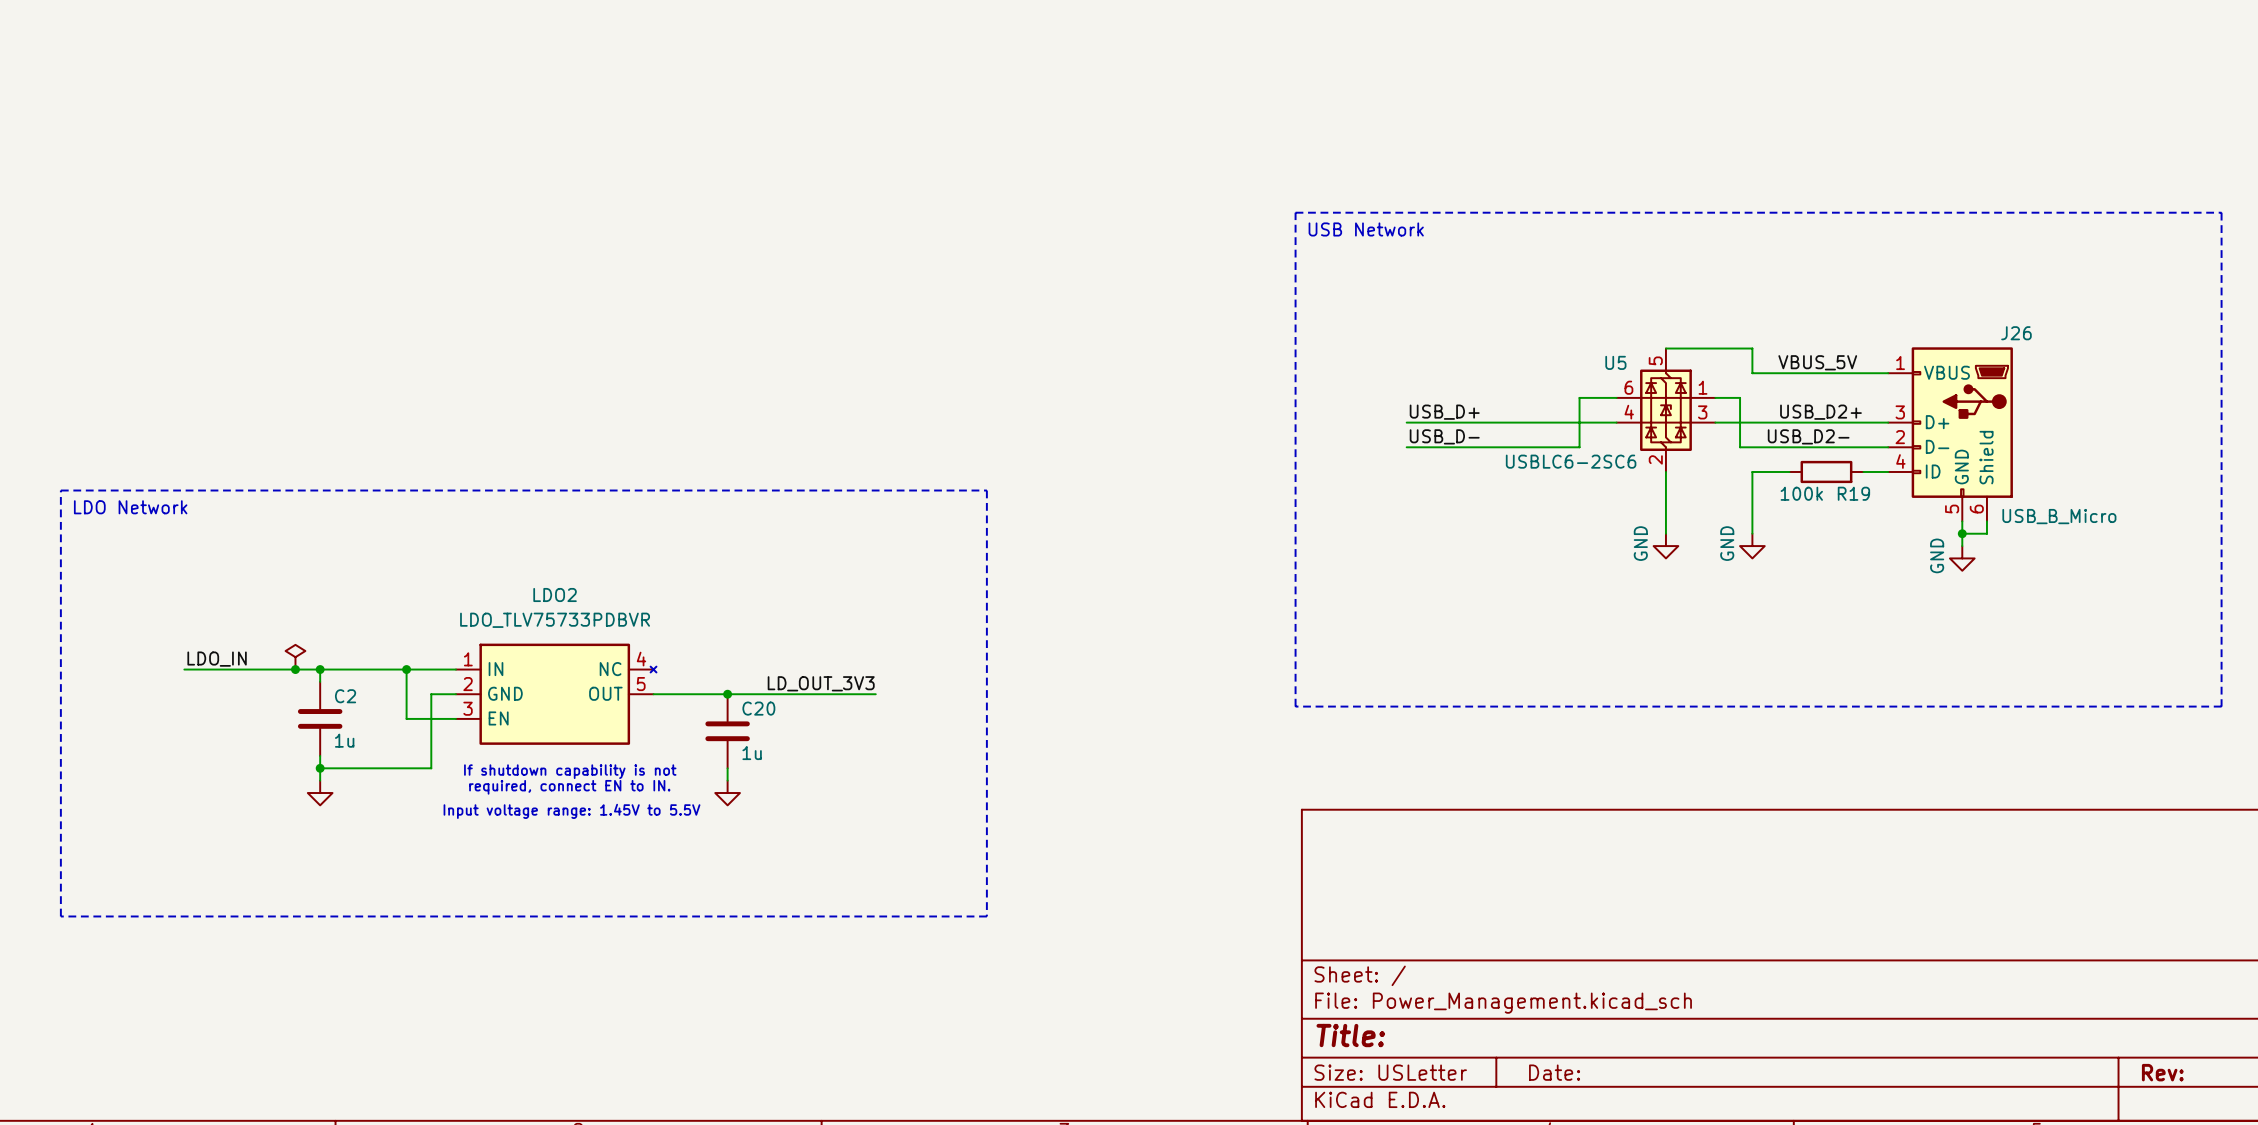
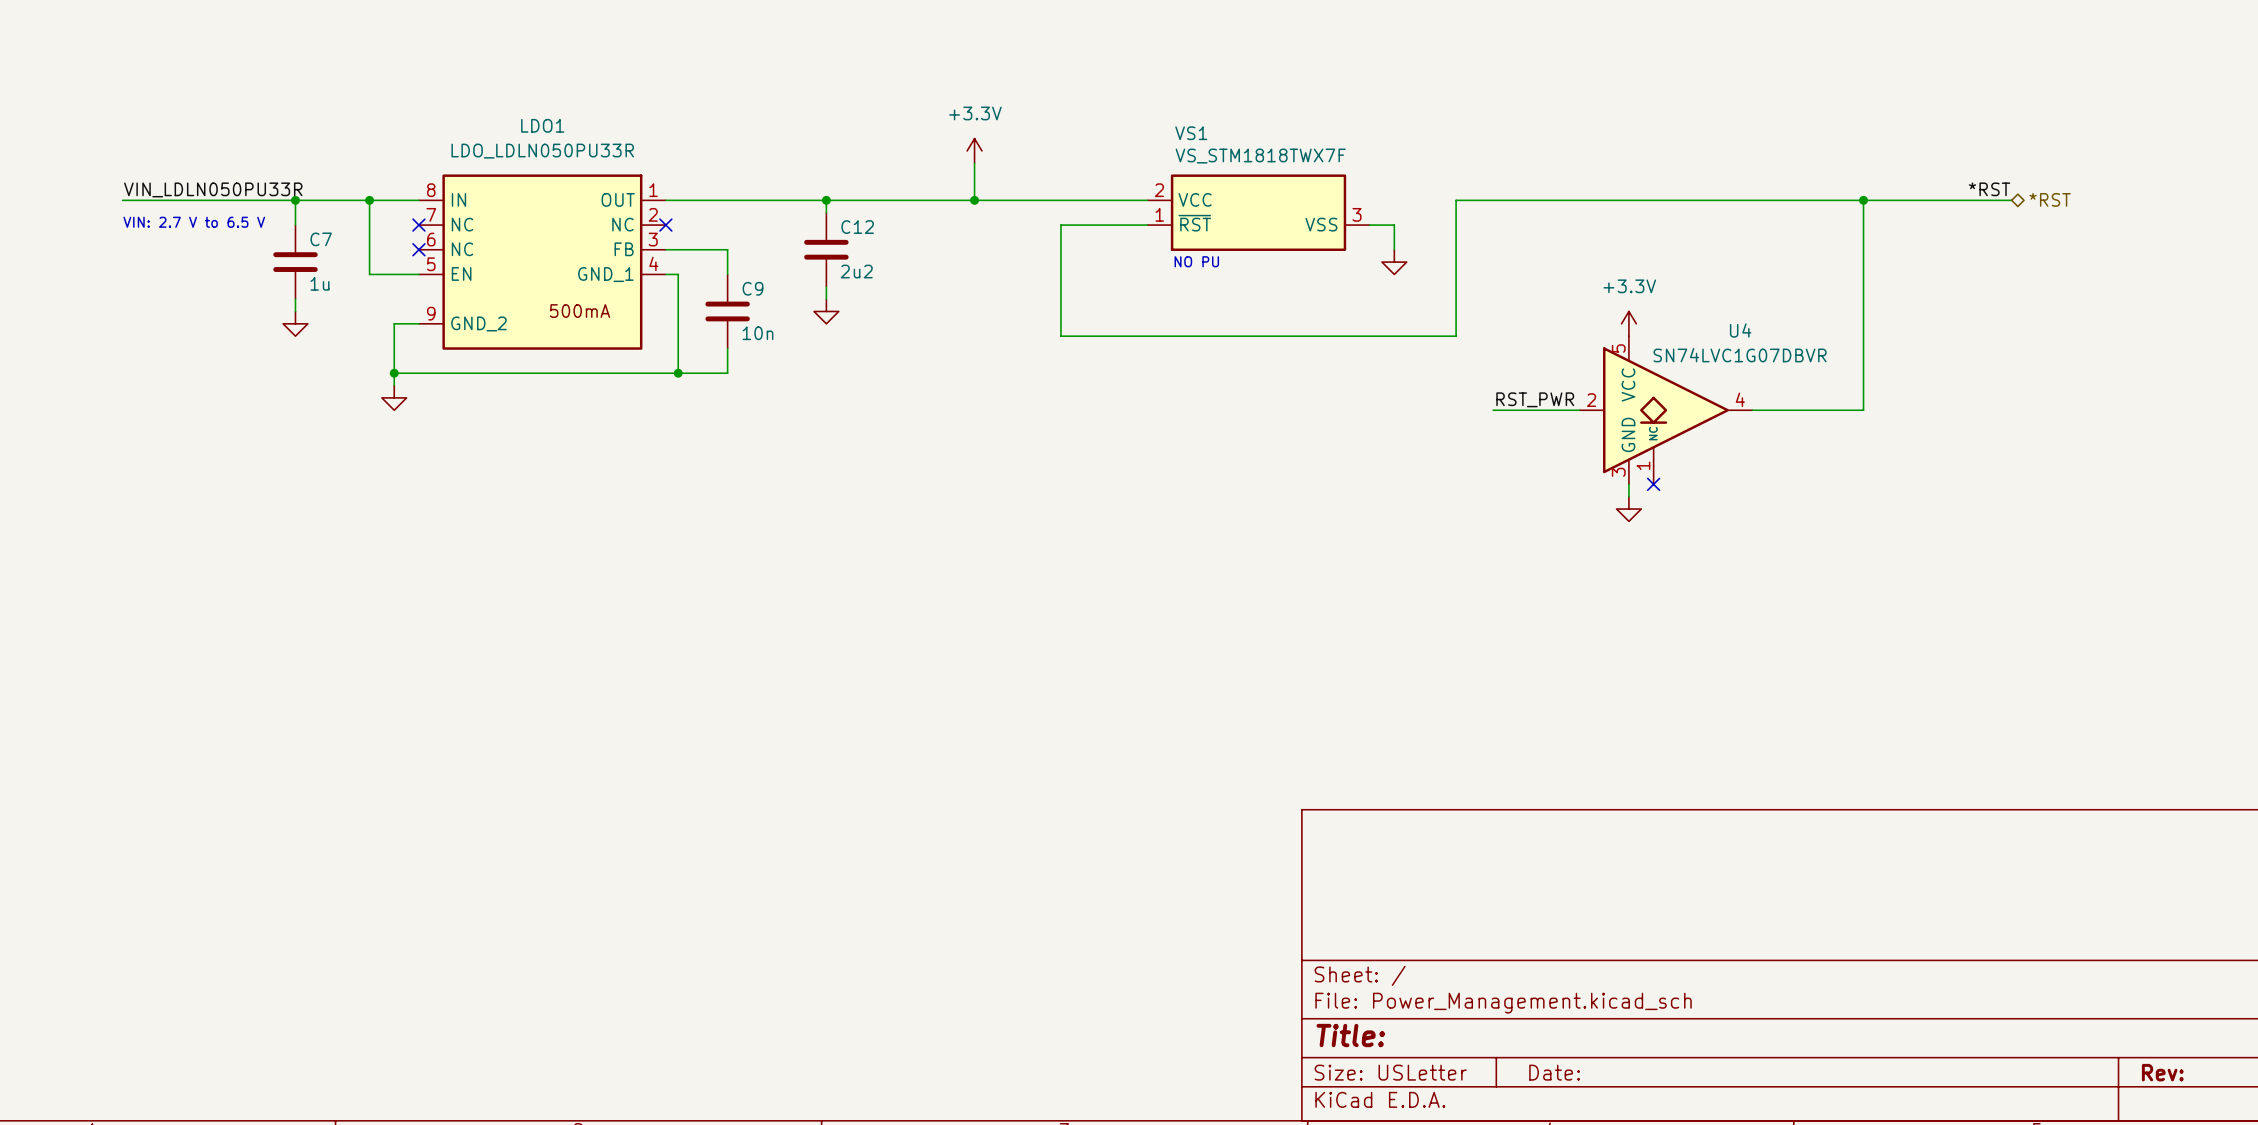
power symbol: none -> +3.3V (974, 150)
wire: none -> (974, 163) (974, 200)
label: none -> VIN_LDLN050PU33R (213, 189)
label: none -> *RST (1989, 189)
hierarchical label: none -> *RST (2050, 199)
wire: none -> (122, 200) (418, 200)
wire: none -> (295, 200) (295, 225)
junction: none -> (295, 200)
wire: none -> (369, 200) (369, 274) (418, 274)
junction: none -> (369, 200)
wire: none -> (665, 200) (1147, 200)
wire: none -> (826, 200) (826, 212)
junction: none -> (826, 200)
junction: none -> (974, 200)
wire: none -> (1863, 200) (1863, 410) (1752, 410)
junction: none -> (1863, 200)
wire: none -> (2011, 200) (1456, 200) (1456, 336) (1060, 336) (1060, 225) (1147, 225)
VS1: none -> VS_STM1818TWX7F (1258, 212)
line: (1295, 212) (2221, 212) (2221, 706) (1295, 706) (1295, 212) -> none
text: none -> VIN: 2.7 V to 6.5 V (194, 222)
no-connect mark: none -> (418, 225)
no-connect mark: none -> (665, 225)
wire: none -> (1369, 225) (1394, 225) (1394, 249)
text: USB Network (1366, 229) -> none
no-connect mark: none -> (418, 249)
wire: none -> (665, 249) (727, 249) (727, 274)
C12: none -> 2u2 (826, 249)
text: none -> NO PU (1196, 261)
C7: none -> 1u (295, 262)
LDO1: none -> LDO_LDLN050PU33R (542, 262)
power symbol: none -> (1394, 262)
wire: none -> (665, 274) (678, 274) (678, 373)
wire: none -> (826, 286) (826, 299)
wire: none -> (295, 299) (295, 311)
C9: none -> 10n (727, 311)
power symbol: none -> (826, 311)
power symbol: none -> (295, 323)
wire: none -> (418, 323) (394, 323) (394, 385)
power symbol: none -> +3.3V (1628, 323)
wire: none -> (727, 348) (727, 373) (394, 373)
wire: (1665, 348) (1752, 348) (1752, 373) (1888, 373) -> none
label: VBUS_5V (1817, 362) -> none
junction: none -> (394, 373)
junction: none -> (678, 373)
power symbol: none -> (394, 397)
wire: (1616, 397) (1579, 397) (1579, 447) (1406, 447) -> none
wire: (1715, 397) (1740, 397) (1740, 447) (1888, 447) -> none
label: none -> RST_PWR (1535, 399)
wire: none -> (1493, 410) (1579, 410)
U5: USBLC6-2SC6 (1665, 410) -> none
U4: none -> SN74LVC1G07DBVR (1665, 410)
label: USB_D+ (1444, 412) -> none
label: USB_D2+ (1820, 412) -> none
wire: (1406, 422) (1616, 422) -> none
wire: (1715, 422) (1888, 422) -> none
J26: USB_B_Micro (1950, 434) -> none
label: USB_D- (1444, 436) -> none
label: USB_D2- (1808, 436) -> none
wire: (1665, 471) (1665, 533) -> none
wire: (1789, 471) (1752, 471) (1752, 533) -> none
R19: 100k (1826, 471) -> none
wire: (1863, 471) (1888, 471) -> none
wire: none -> (1628, 484) (1628, 496)
no-connect mark: none -> (1653, 484)
line: (60, 490) (986, 490) (986, 916) (60, 916) (60, 490) -> none
text: LDO Network (130, 507) -> none
power symbol: none -> (1628, 509)
wire: (1962, 521) (1962, 546) -> none
wire: (1986, 521) (1986, 533) (1962, 533) -> none
junction: (1962, 533) -> none
power symbol: GND (1665, 546) -> none
power symbol: GND (1752, 546) -> none
power symbol: GND (1962, 558) -> none
power symbol: (295, 657) -> none
label: LDO_IN (217, 659) -> none
wire: (184, 669) (455, 669) -> none
junction: (295, 669) -> none
wire: (320, 669) (320, 681) -> none
junction: (320, 669) -> none
wire: (406, 669) (406, 718) (455, 718) -> none
junction: (406, 669) -> none
label: LD_OUT_3V3 (821, 683) -> none
wire: (455, 694) (431, 694) (431, 768) (320, 768) -> none
LDO2: LDO_TLV75733PDBVR (556, 694) -> none
wire: (653, 694) (875, 694) -> none
junction: (727, 694) -> none
C2: 1u (320, 718) -> none
C20: 1u (727, 731) -> none
wire: (320, 755) (320, 780) -> none
junction: (320, 768) -> none
wire: (727, 768) (727, 780) -> none
text: If shutdown capability is not (570, 771) -> none
text: required, connect EN to IN. (569, 787) -> none
power symbol: (320, 793) -> none
power symbol: (727, 793) -> none
text: Input voltage range: 1.45V to 5.5V (572, 811) -> none

